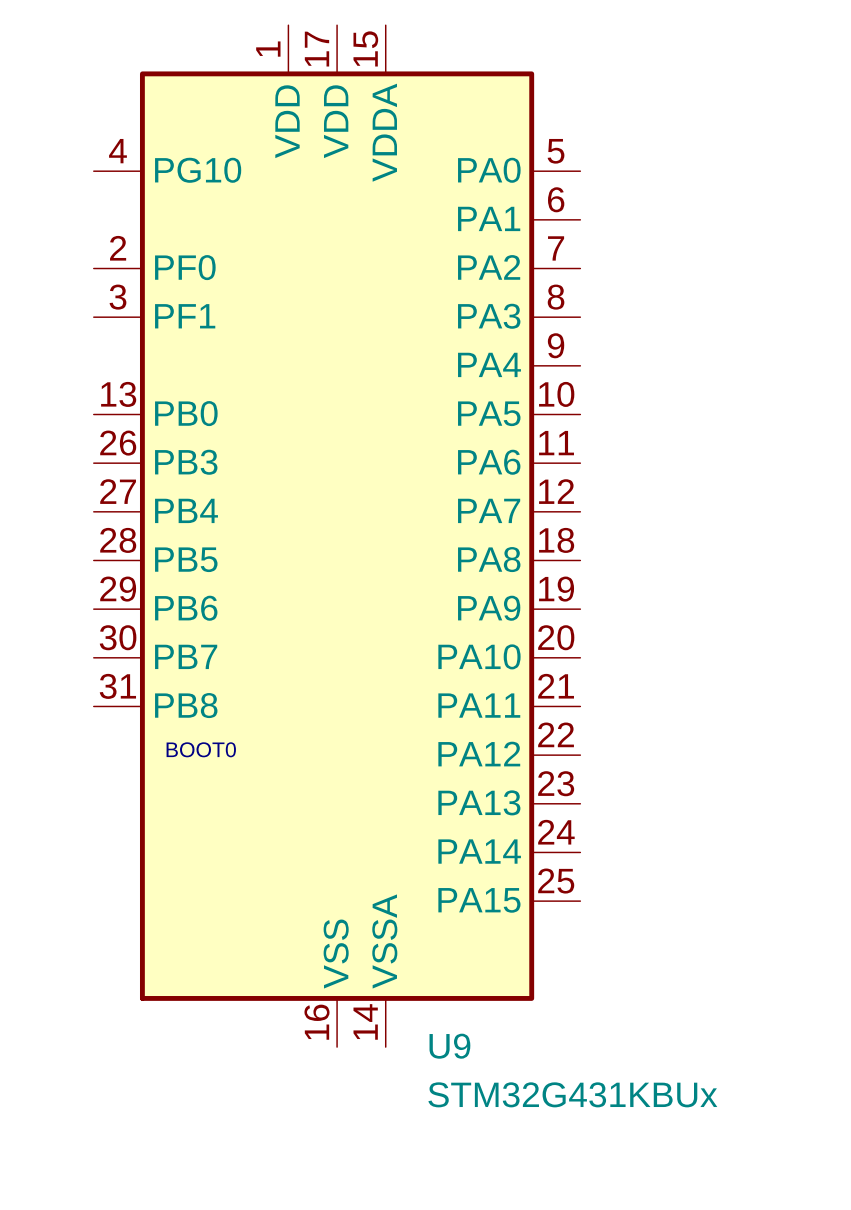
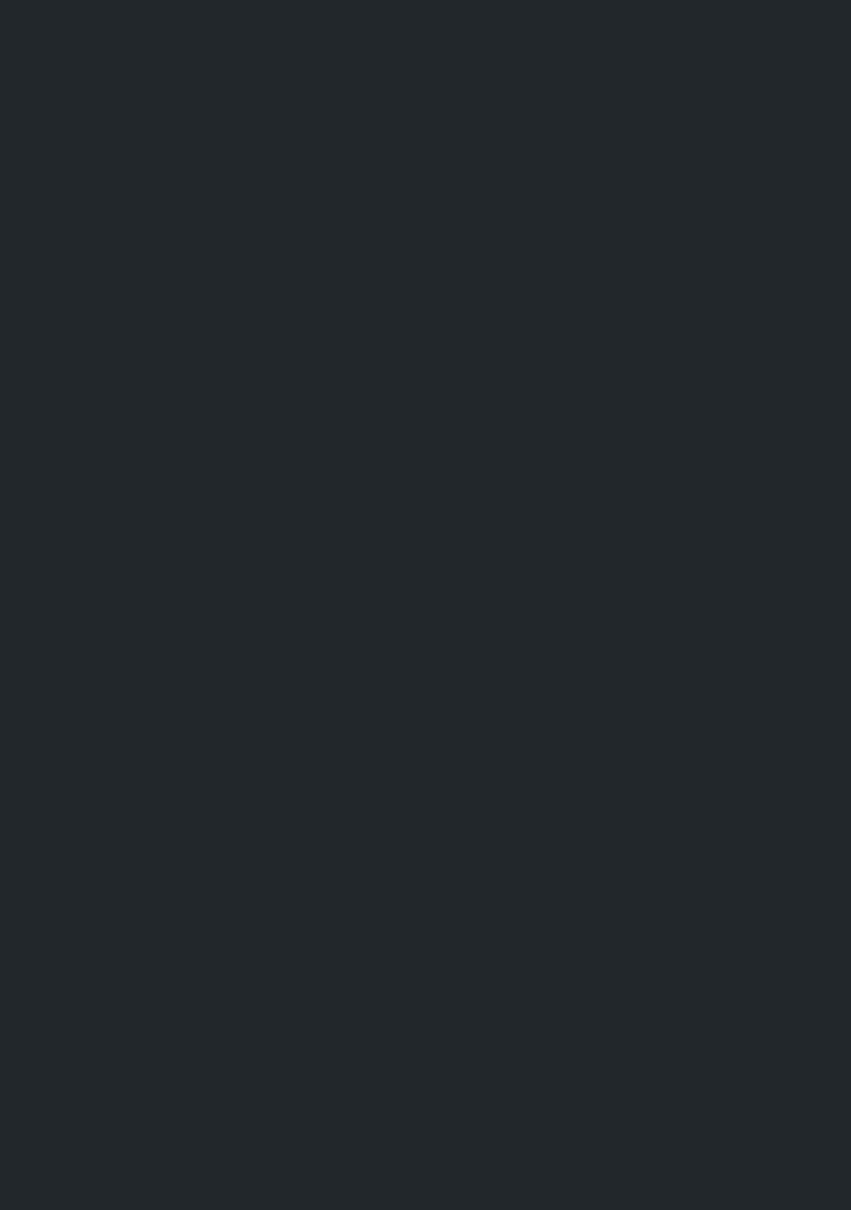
U9: STM32G431KBUx (337, 536) -> none
text: BOOT0 (201, 749) -> none

